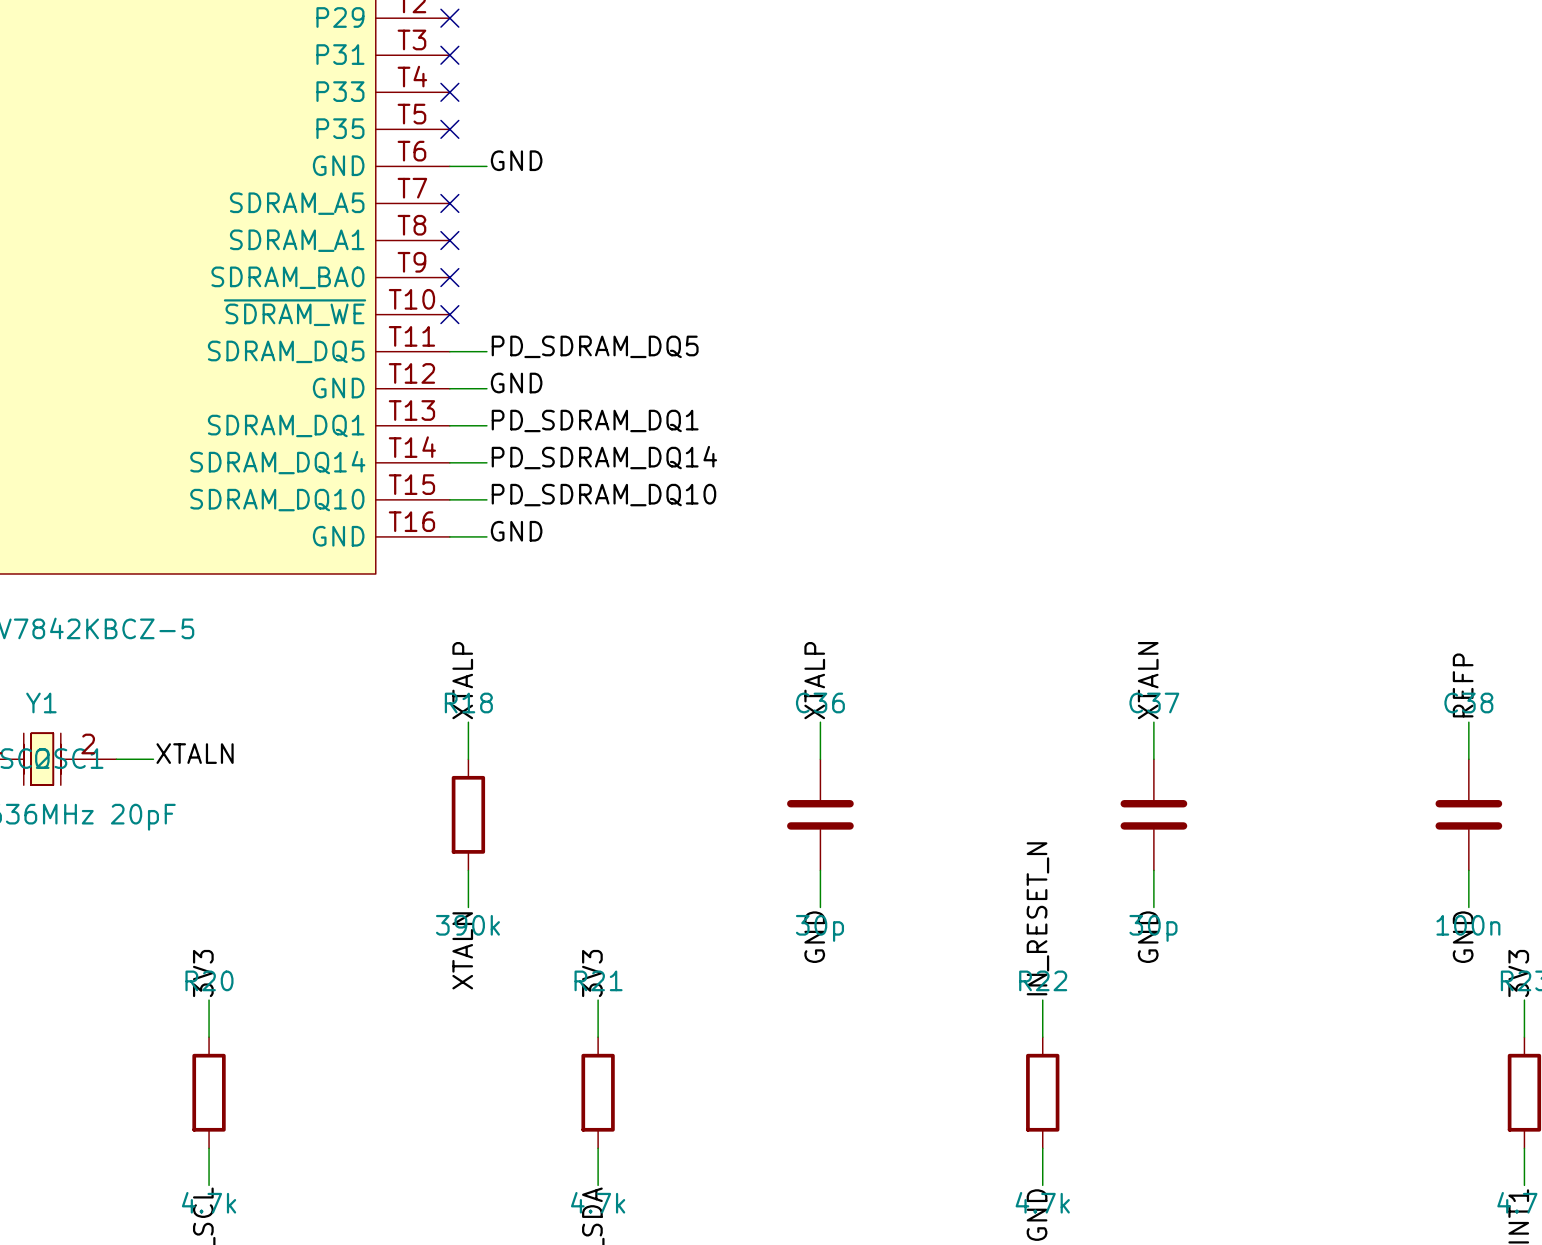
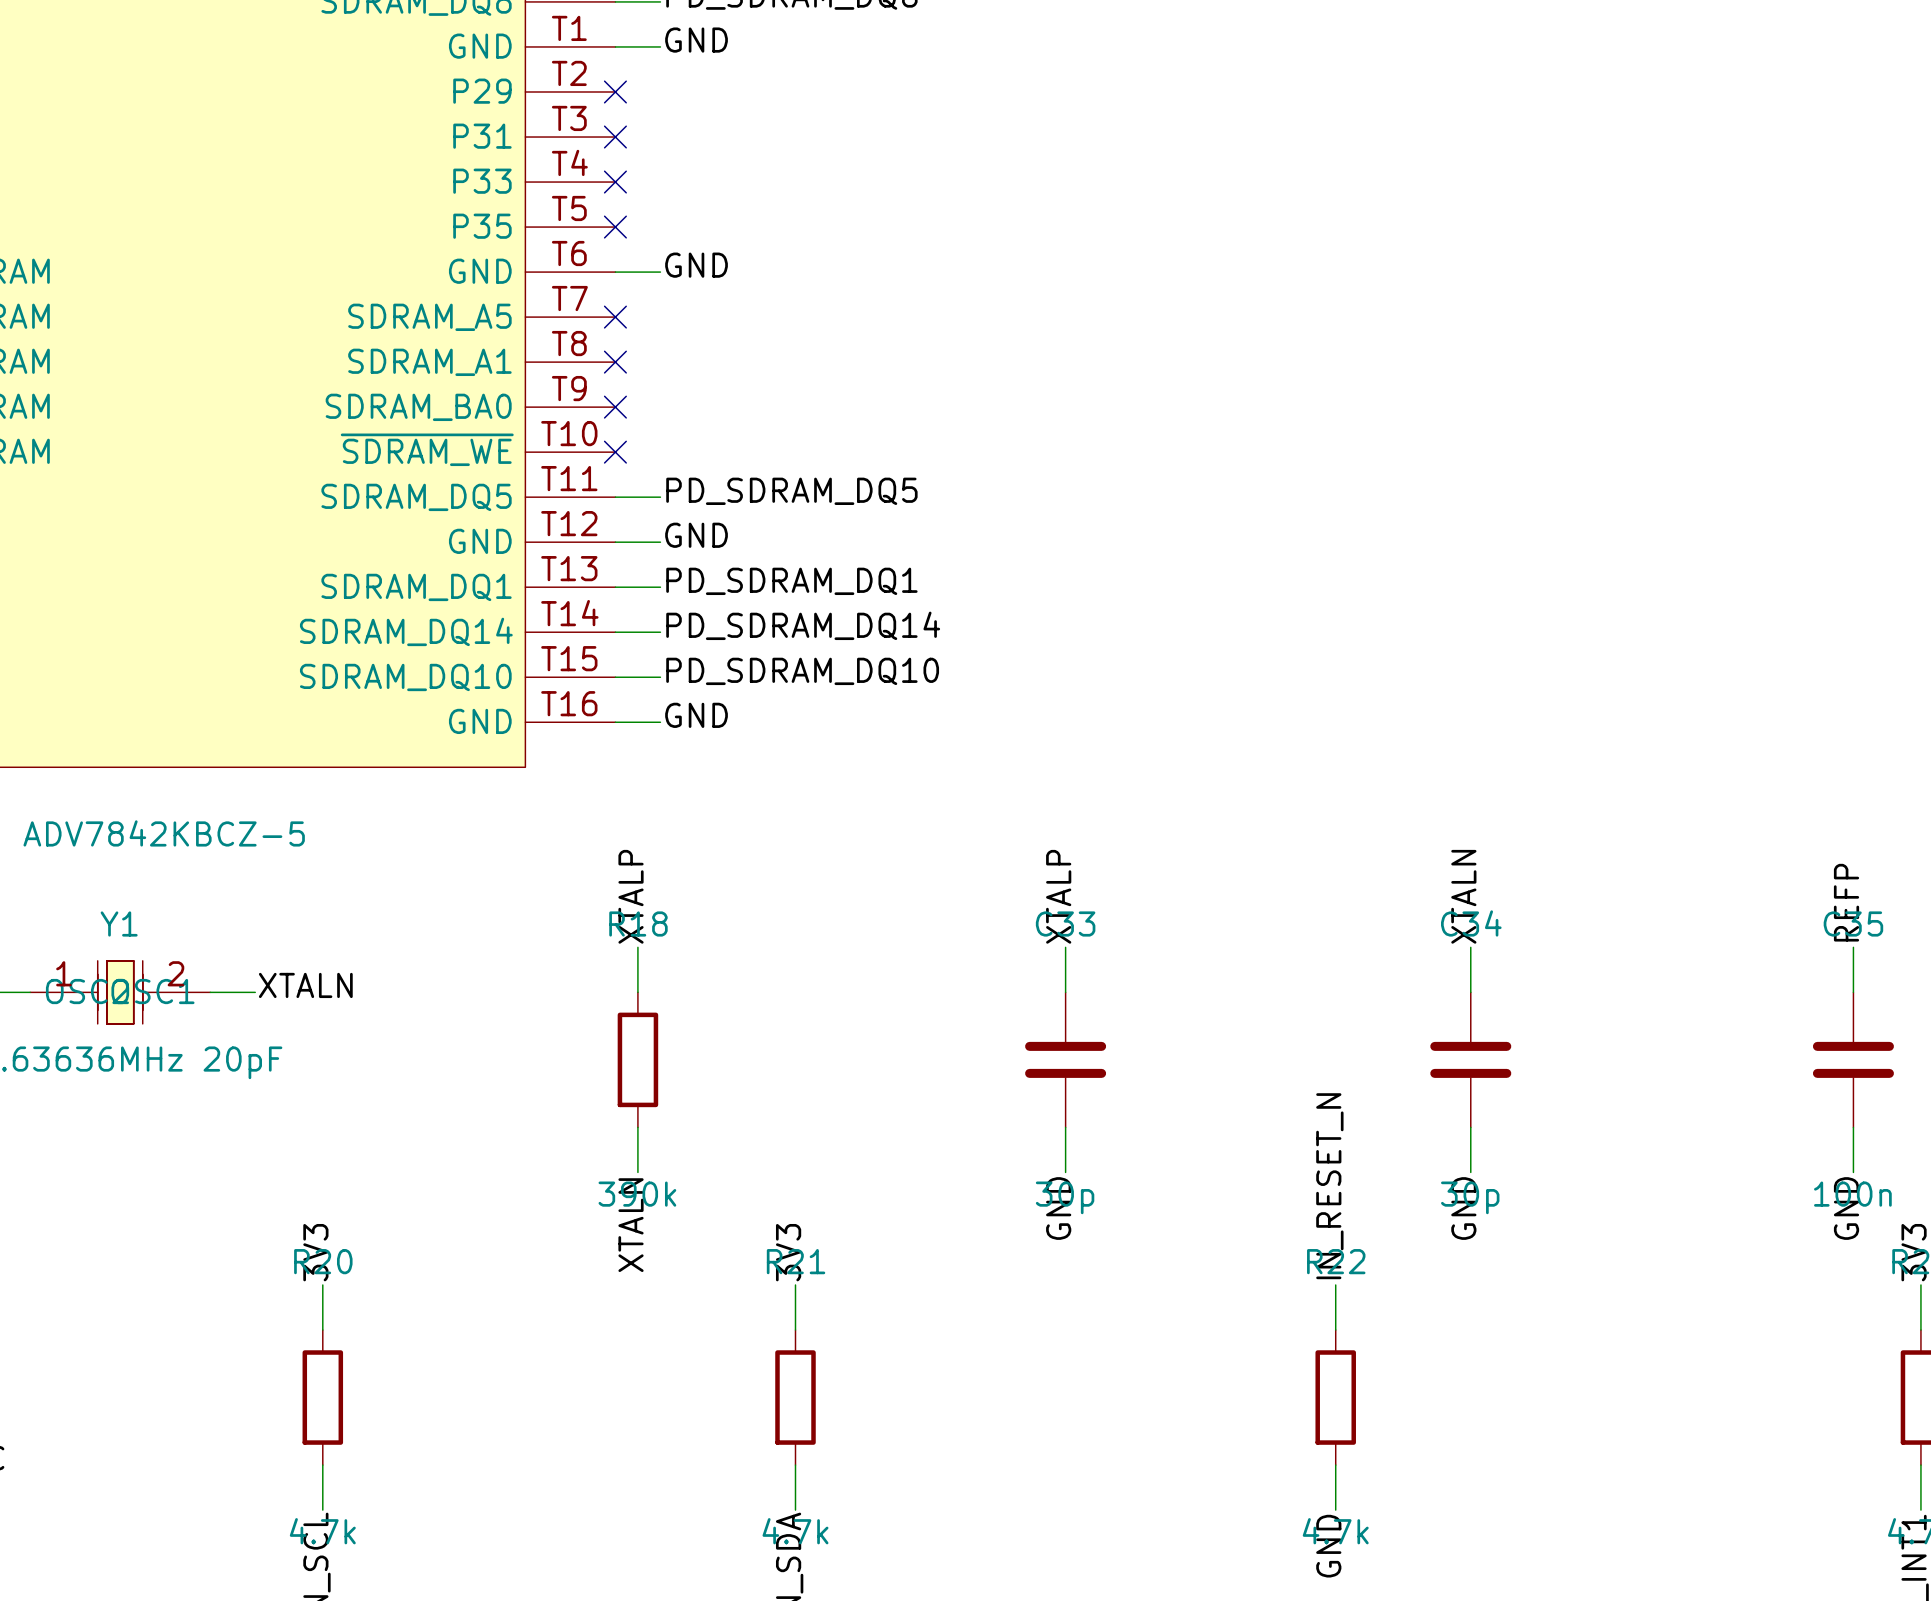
C36 name: C36 (820, 702) -> C33 (1065, 924)
C37 name: C37 (1154, 702) -> C34 (1471, 923)
C38 name: C38 (1468, 702) -> C35 (1853, 924)

